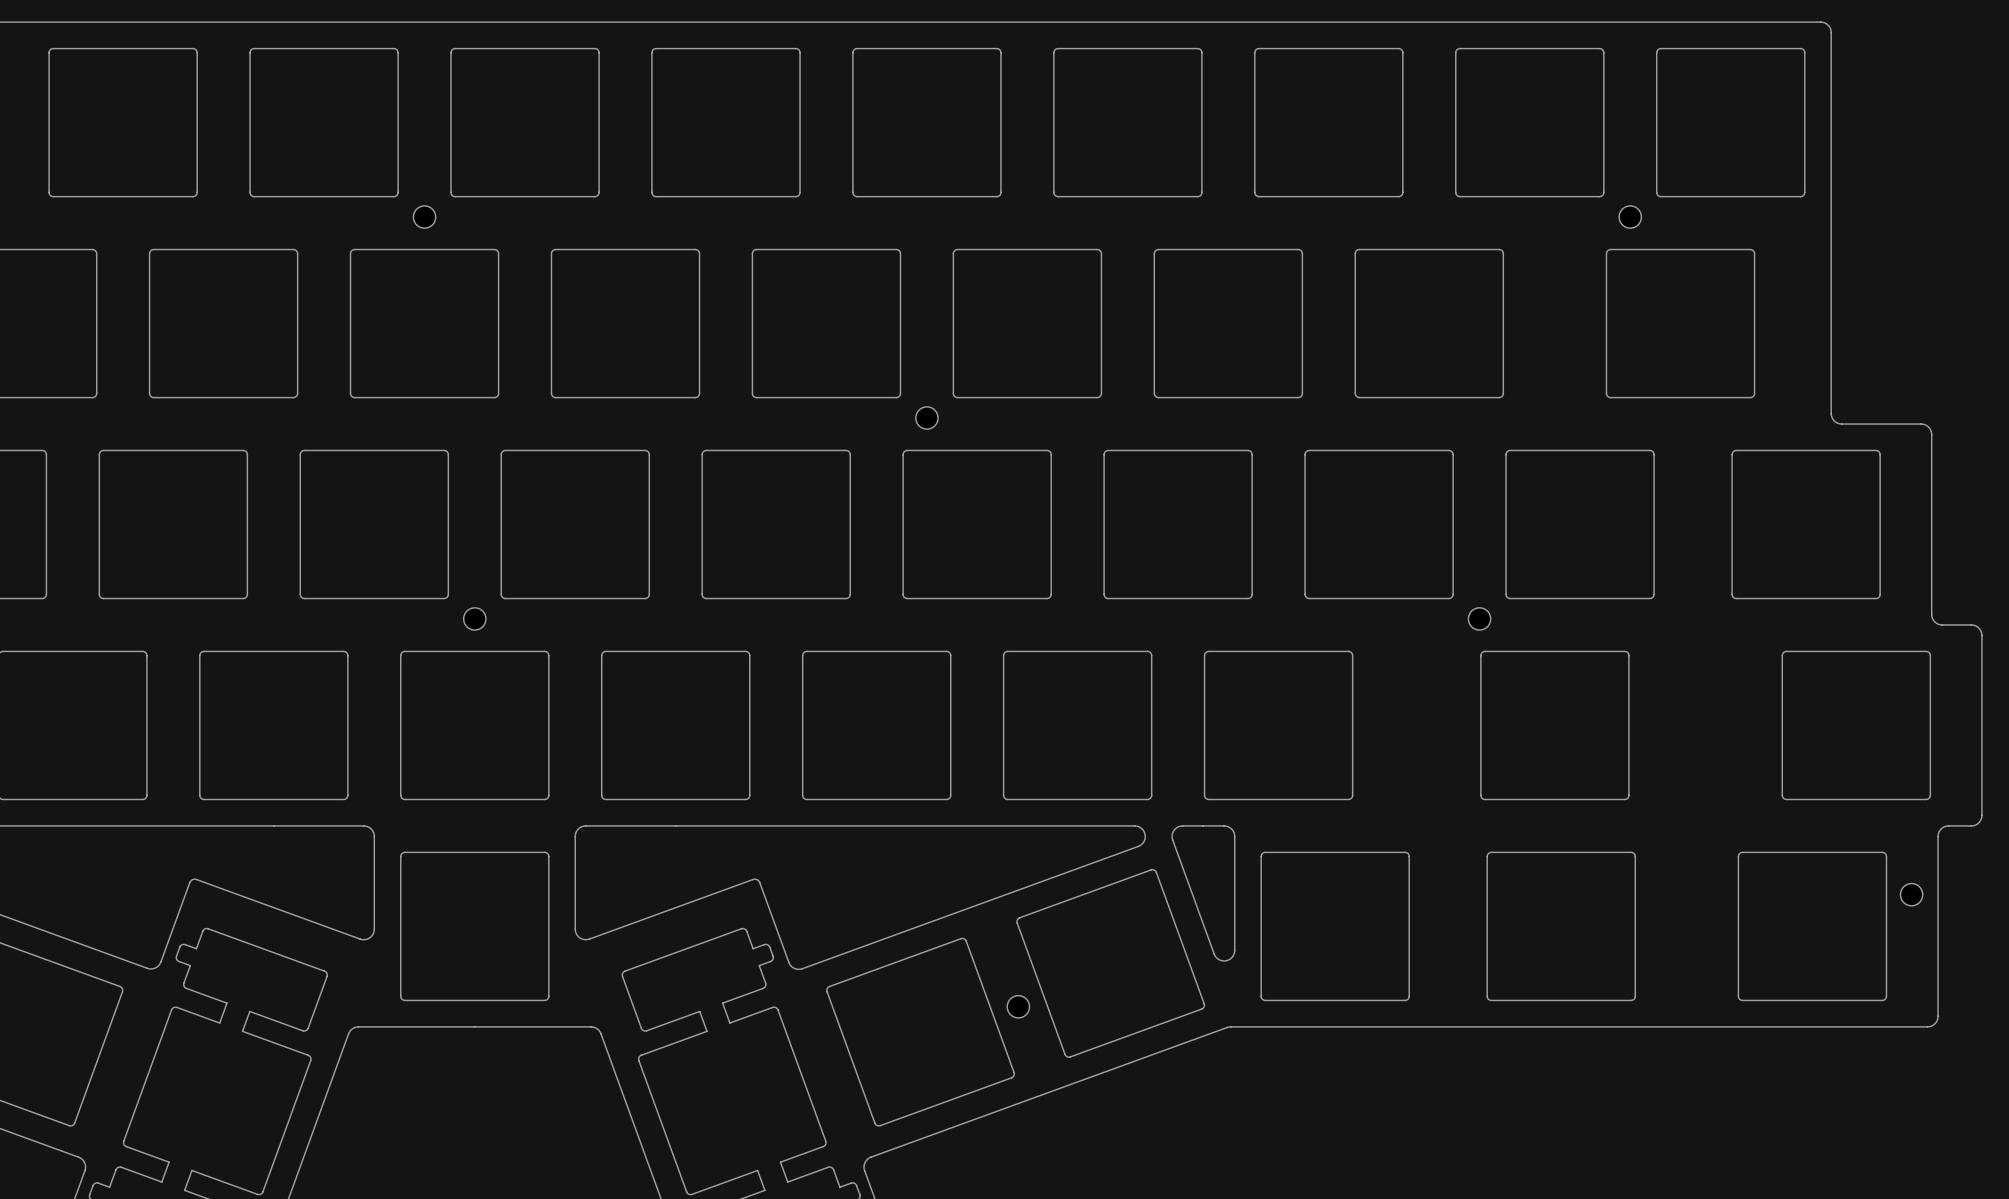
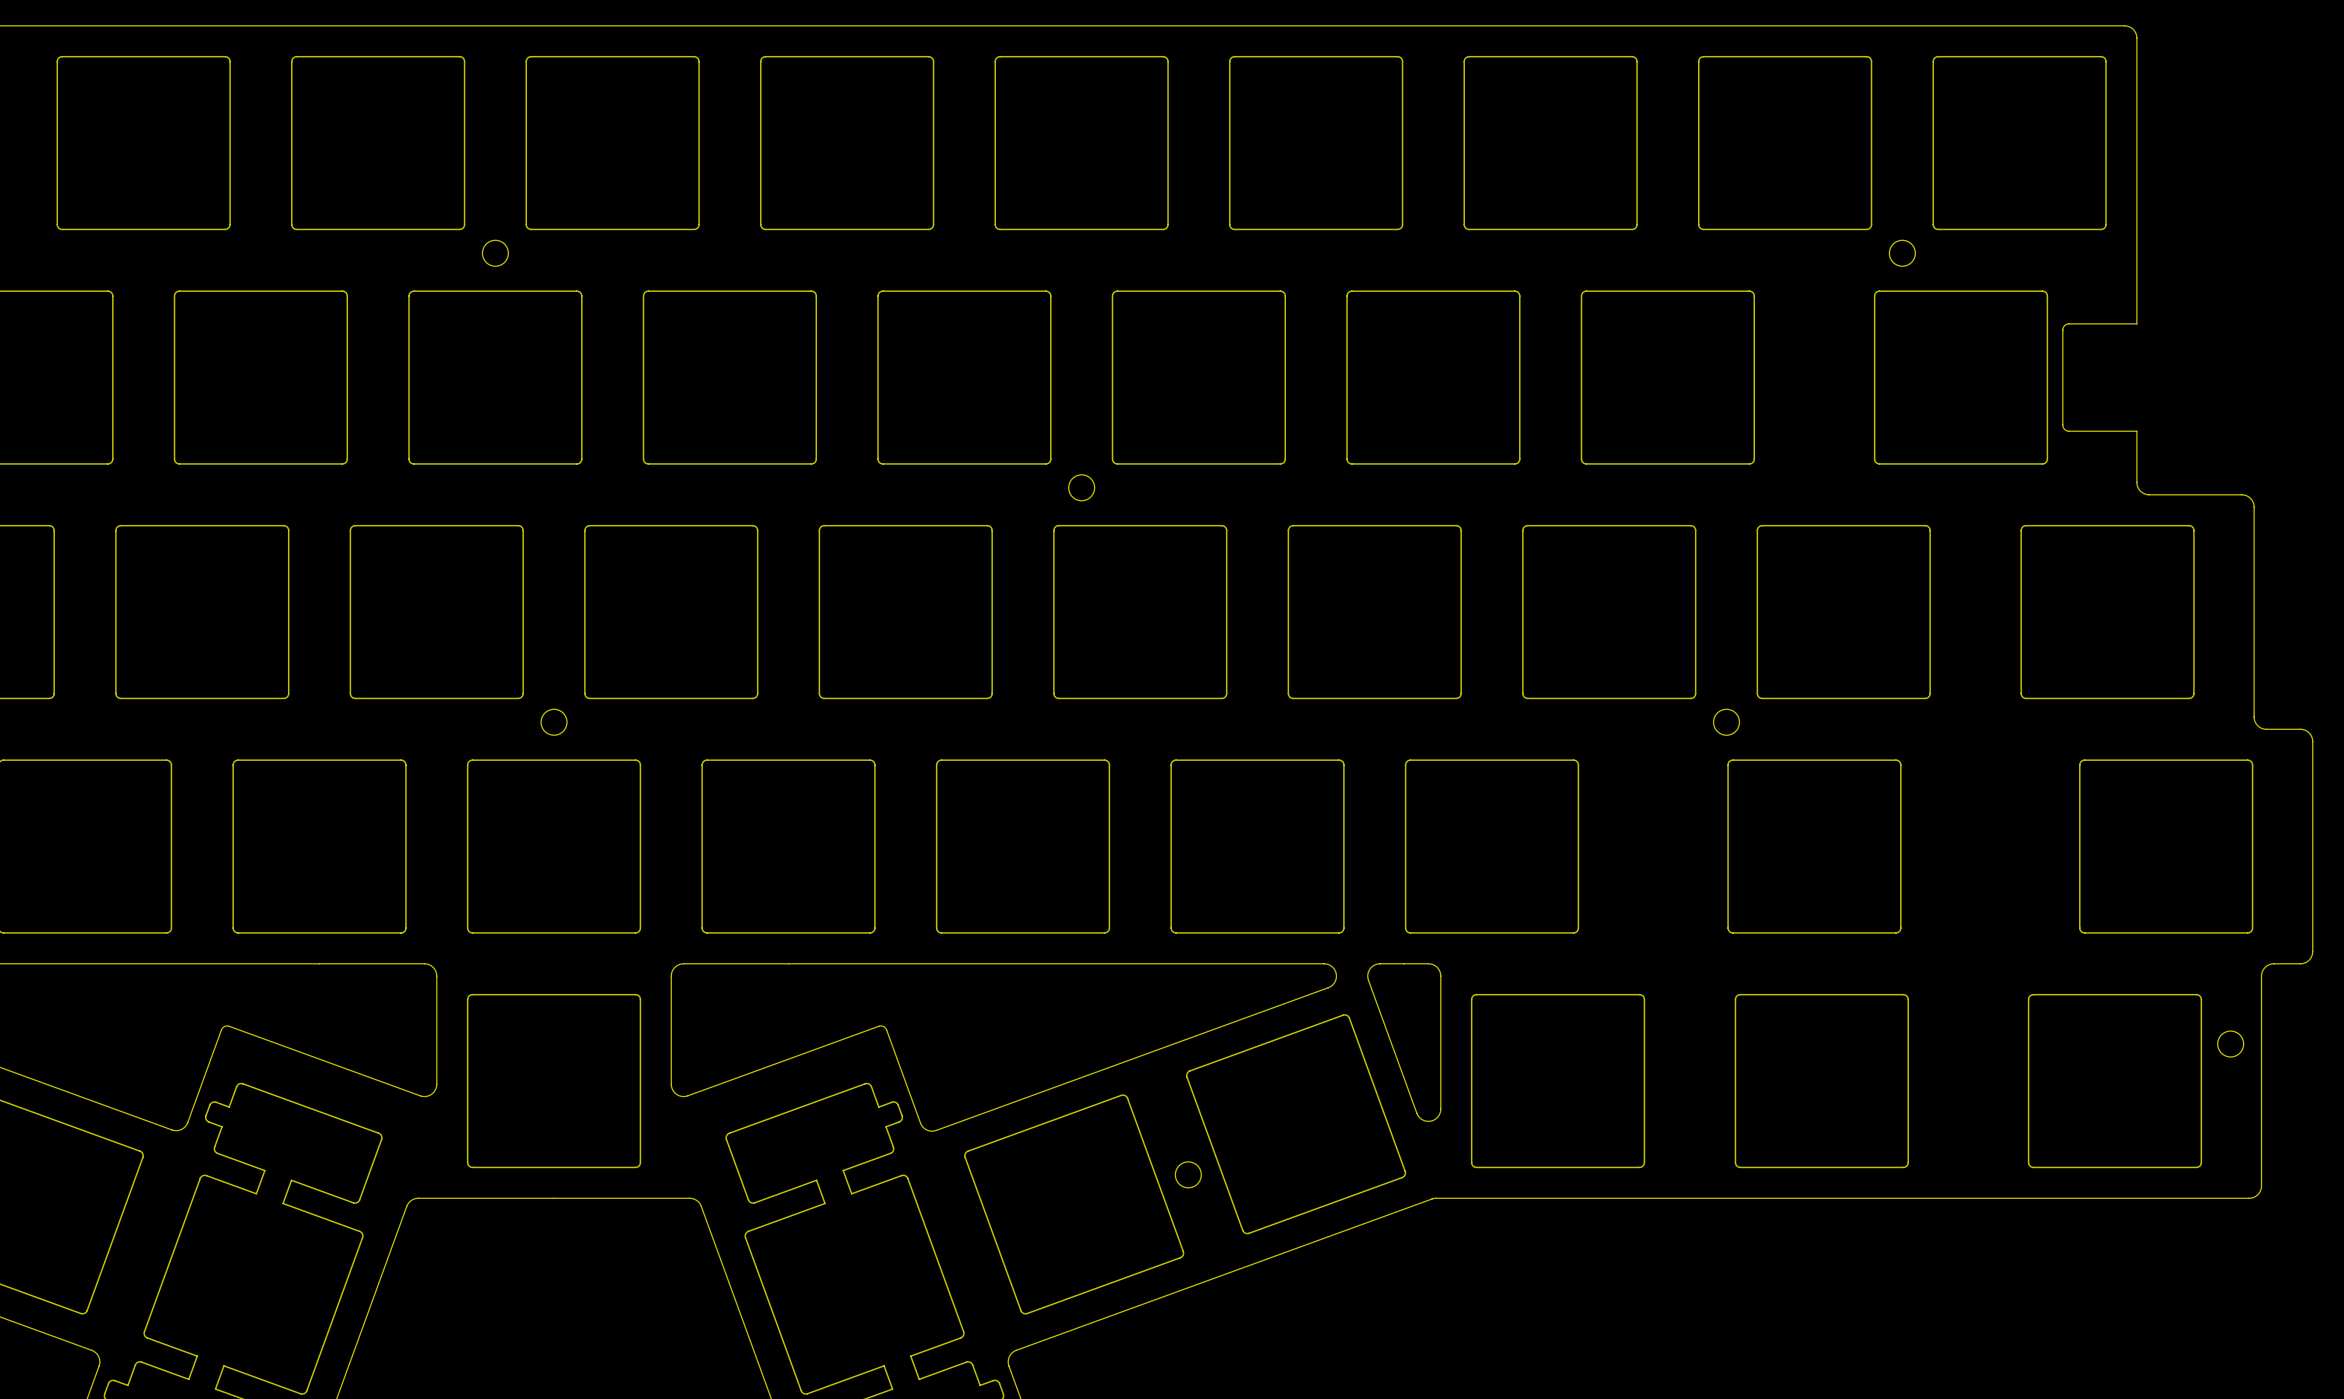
board edge: (1831, 277) (1831, 369) -> (2136, 323) (2068, 323) (2064, 326) (2062, 330) (2064, 428) (2068, 431) (2136, 431)

